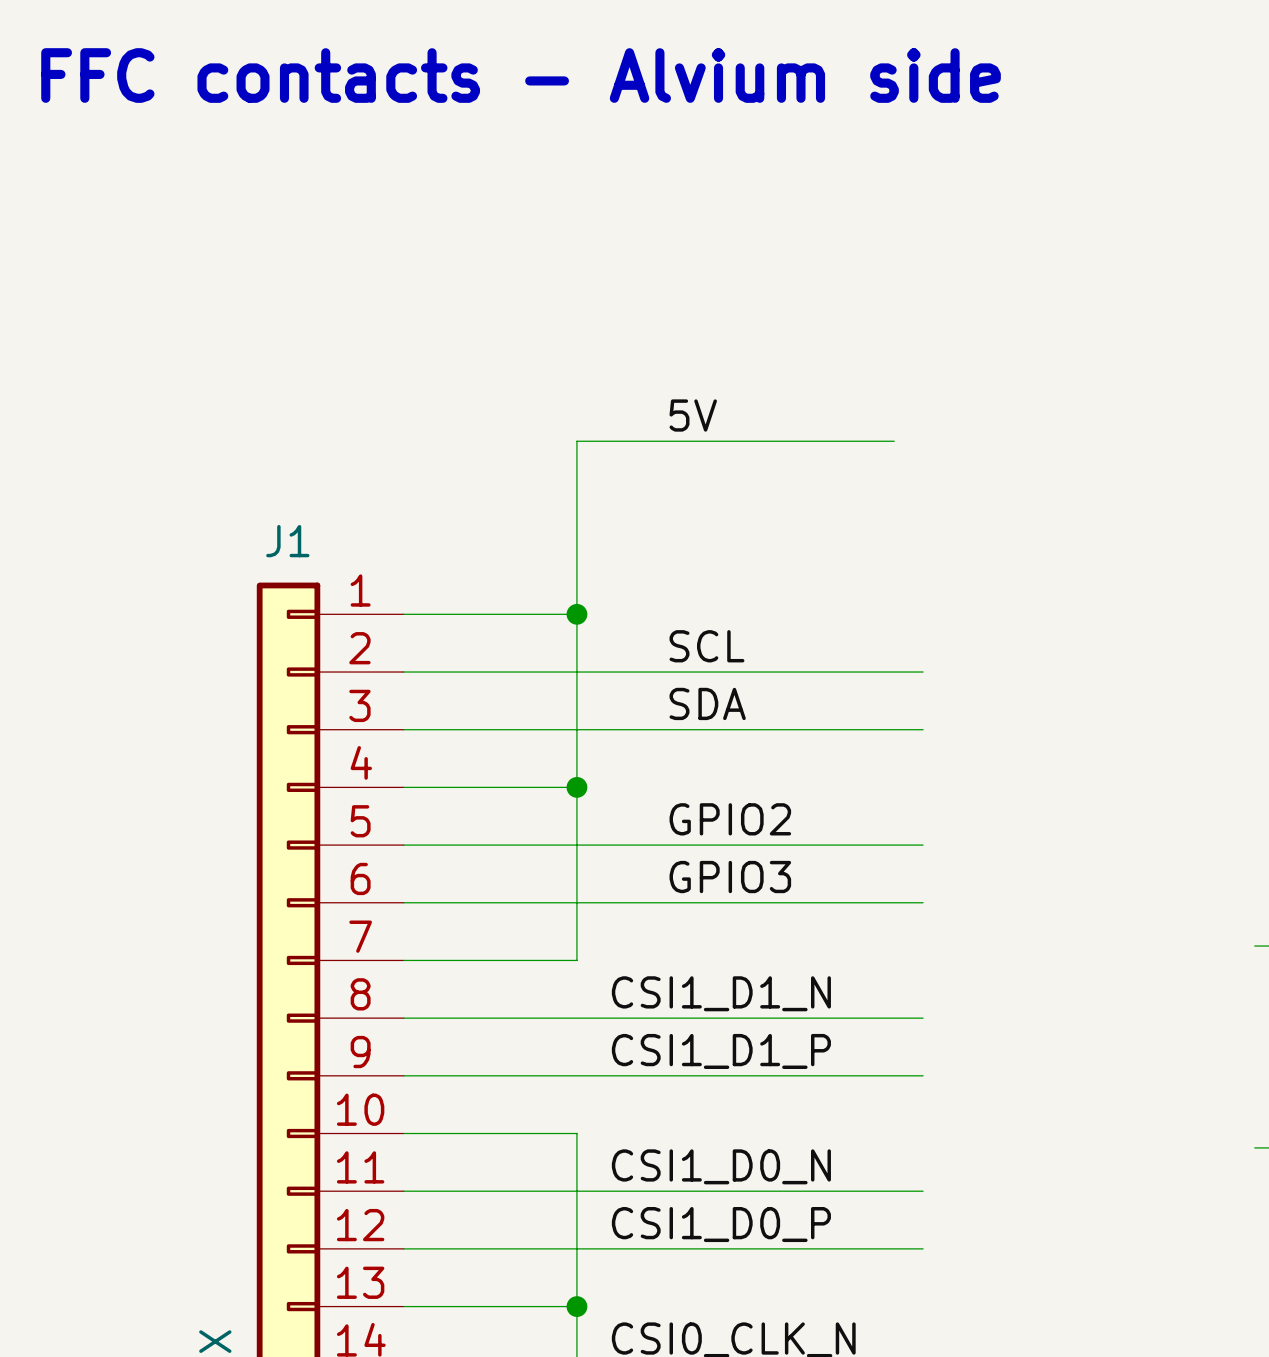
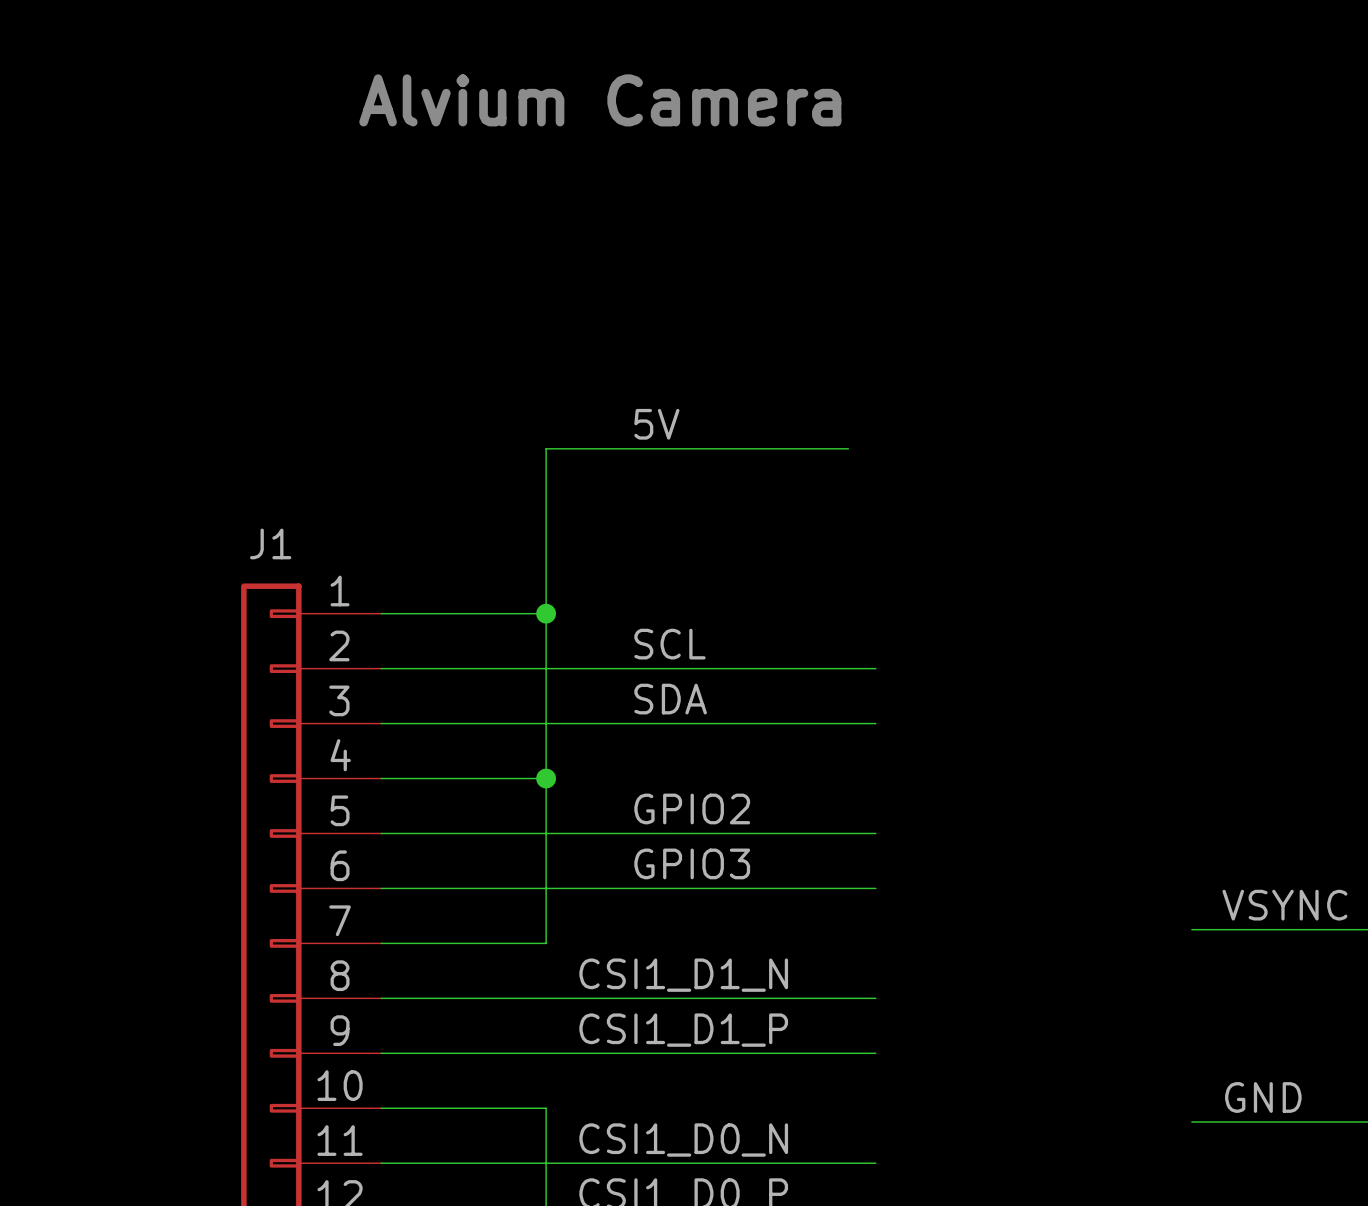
text: FFC contacts - Alvium side (521, 75) -> none
text: none -> Alvium Camera (600, 100)

